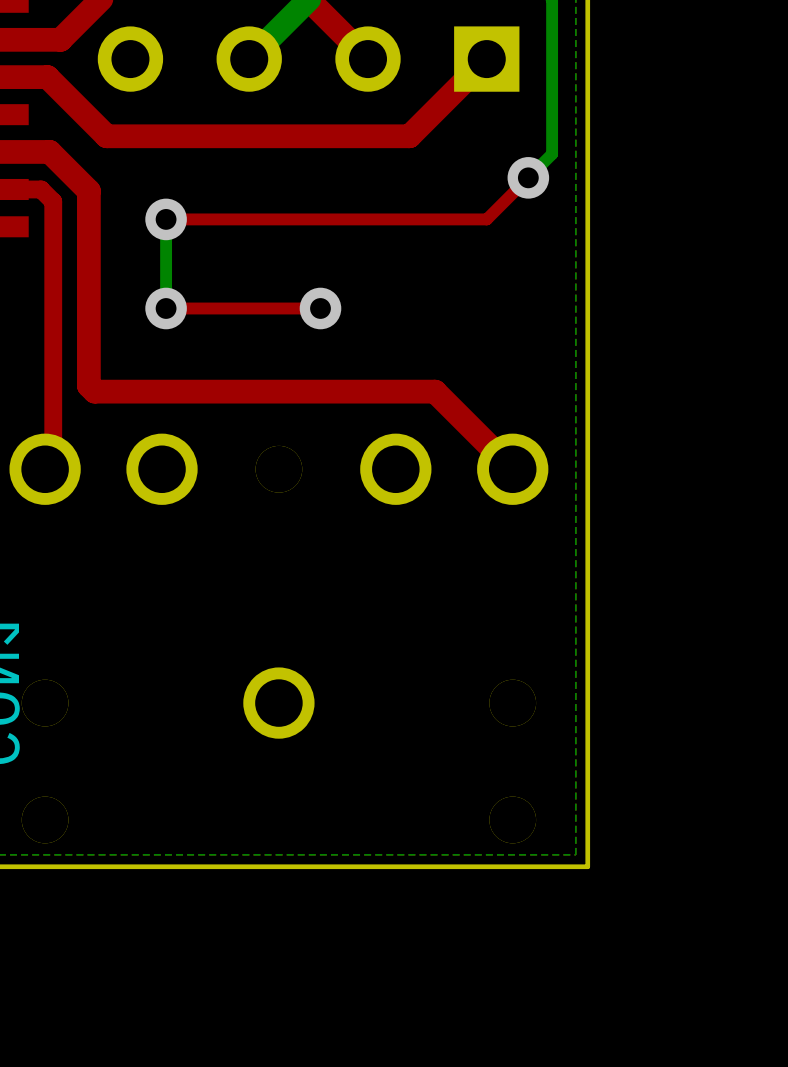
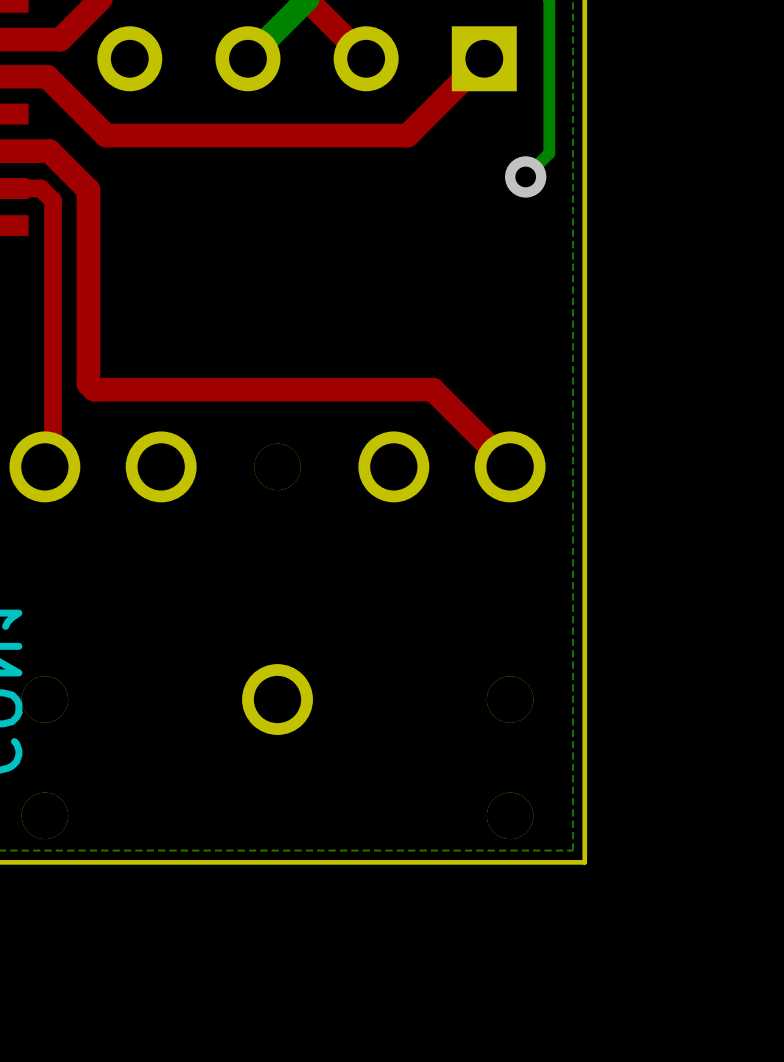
top track: (528, 177) (486, 219) (166, 219) -> none
bottom track: (166, 219) (166, 308) -> none
via: (166, 219) -> none
via: (166, 308) -> none
top track: (320, 308) (166, 308) -> none
via: (320, 308) -> none

